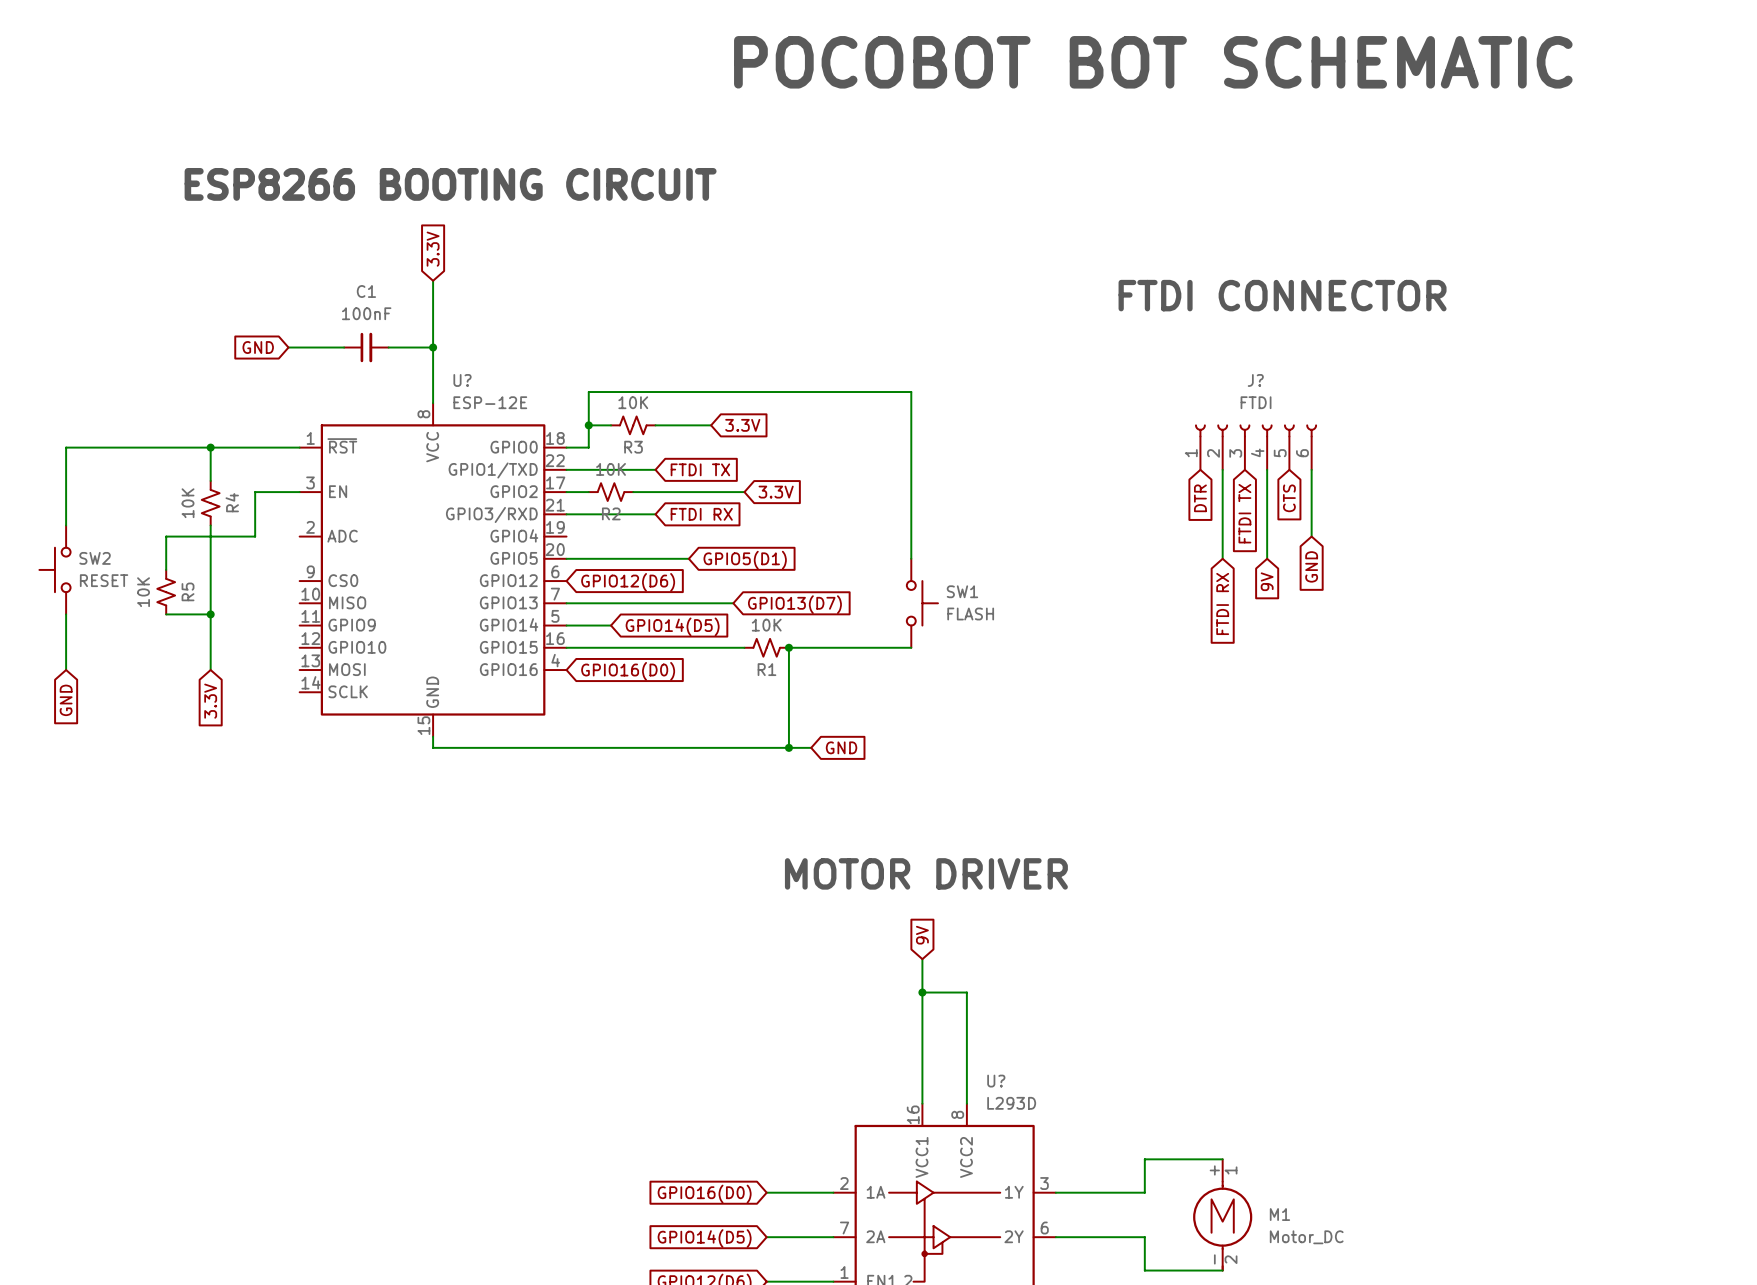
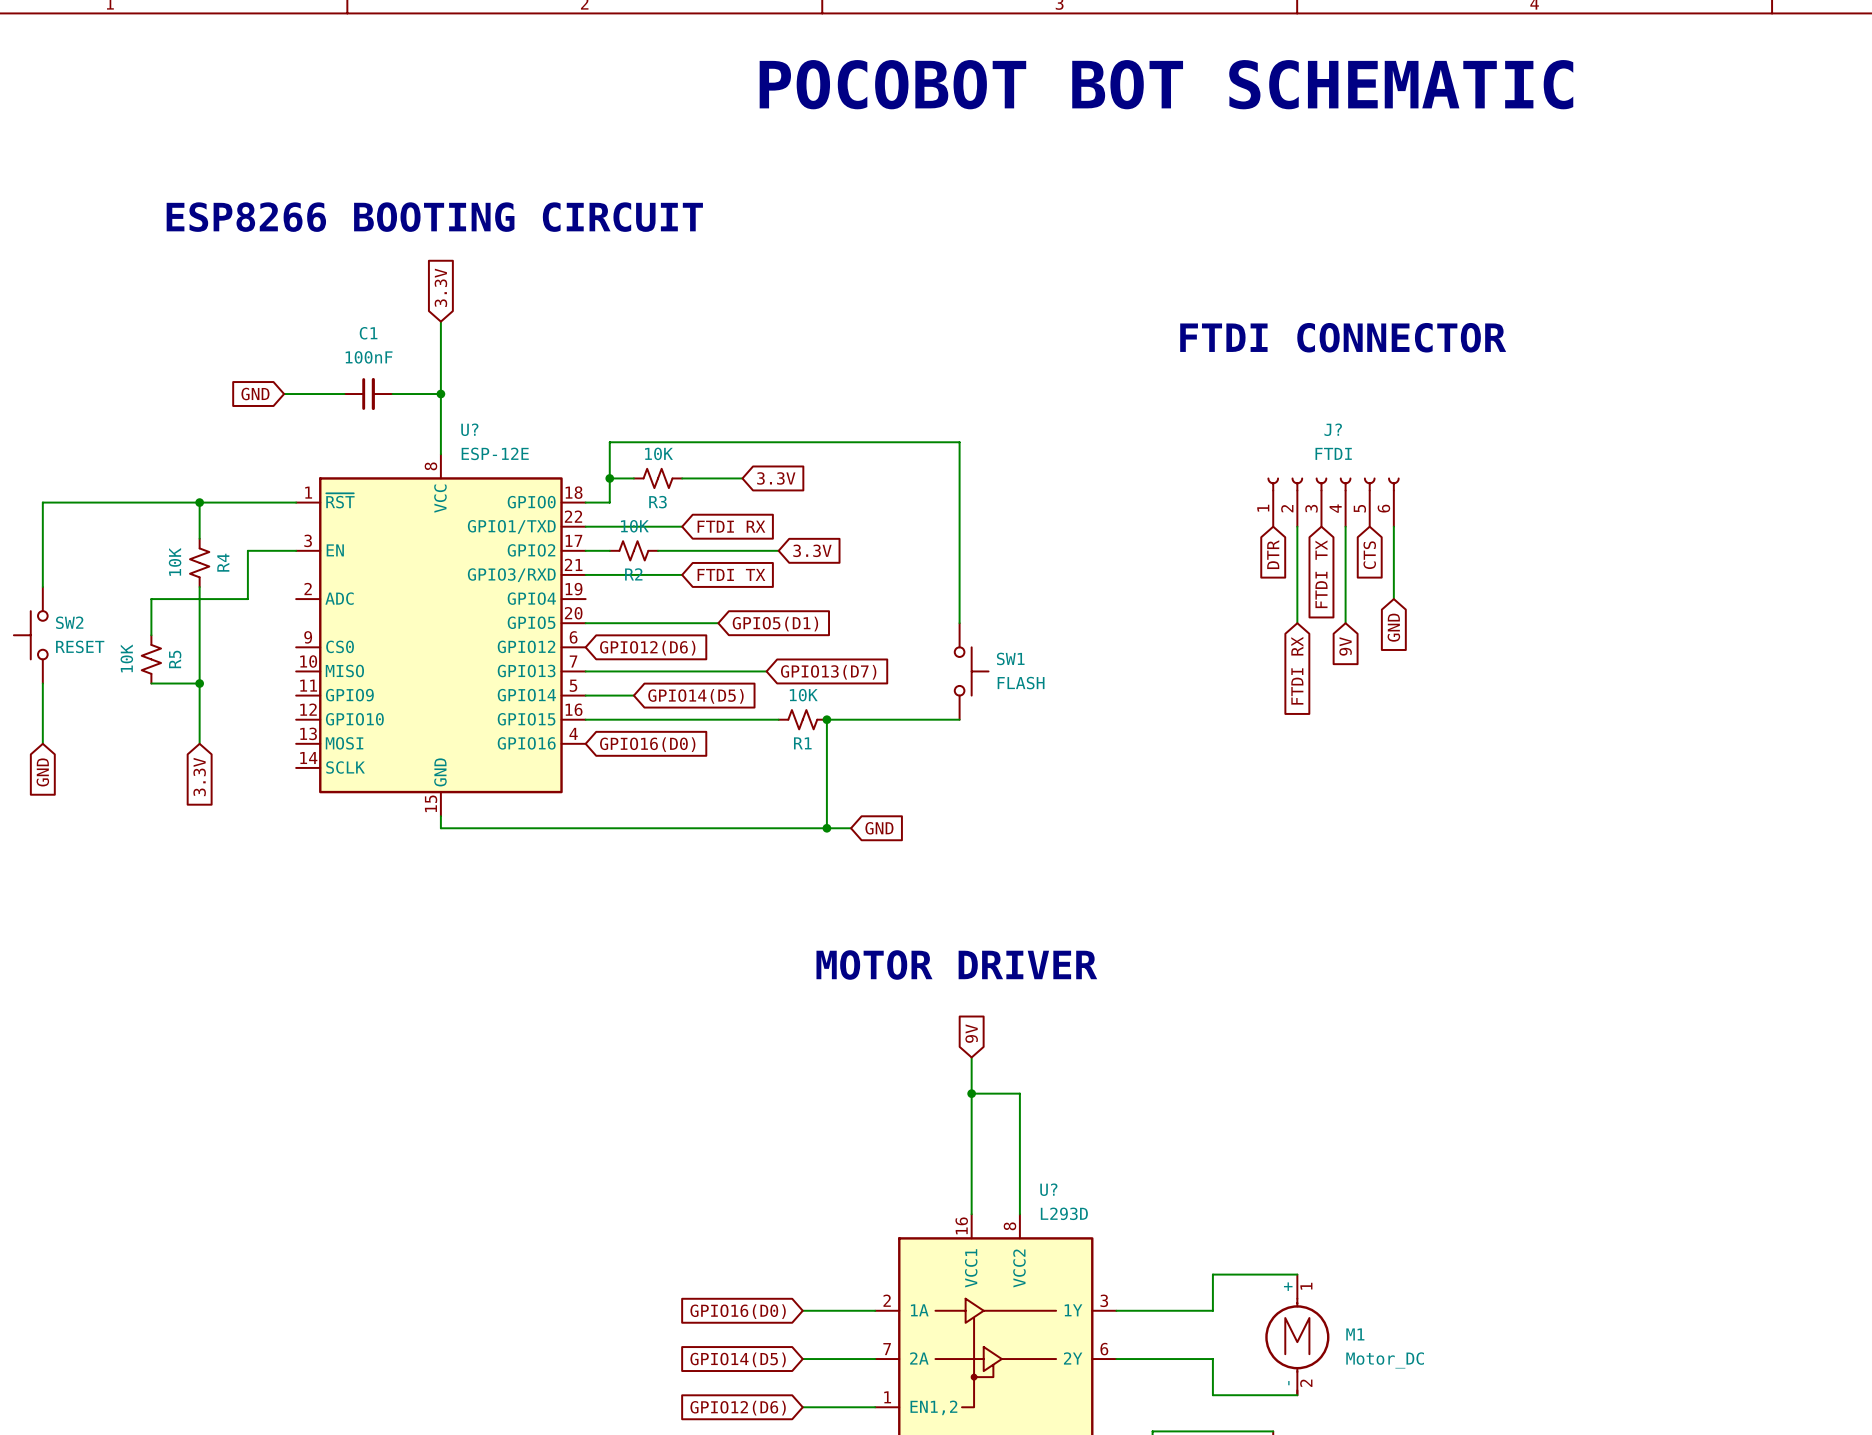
global label: FTDI TX (700, 469) -> FTDI RX (731, 526)
global label: FTDI RX (701, 514) -> FTDI TX (731, 574)

